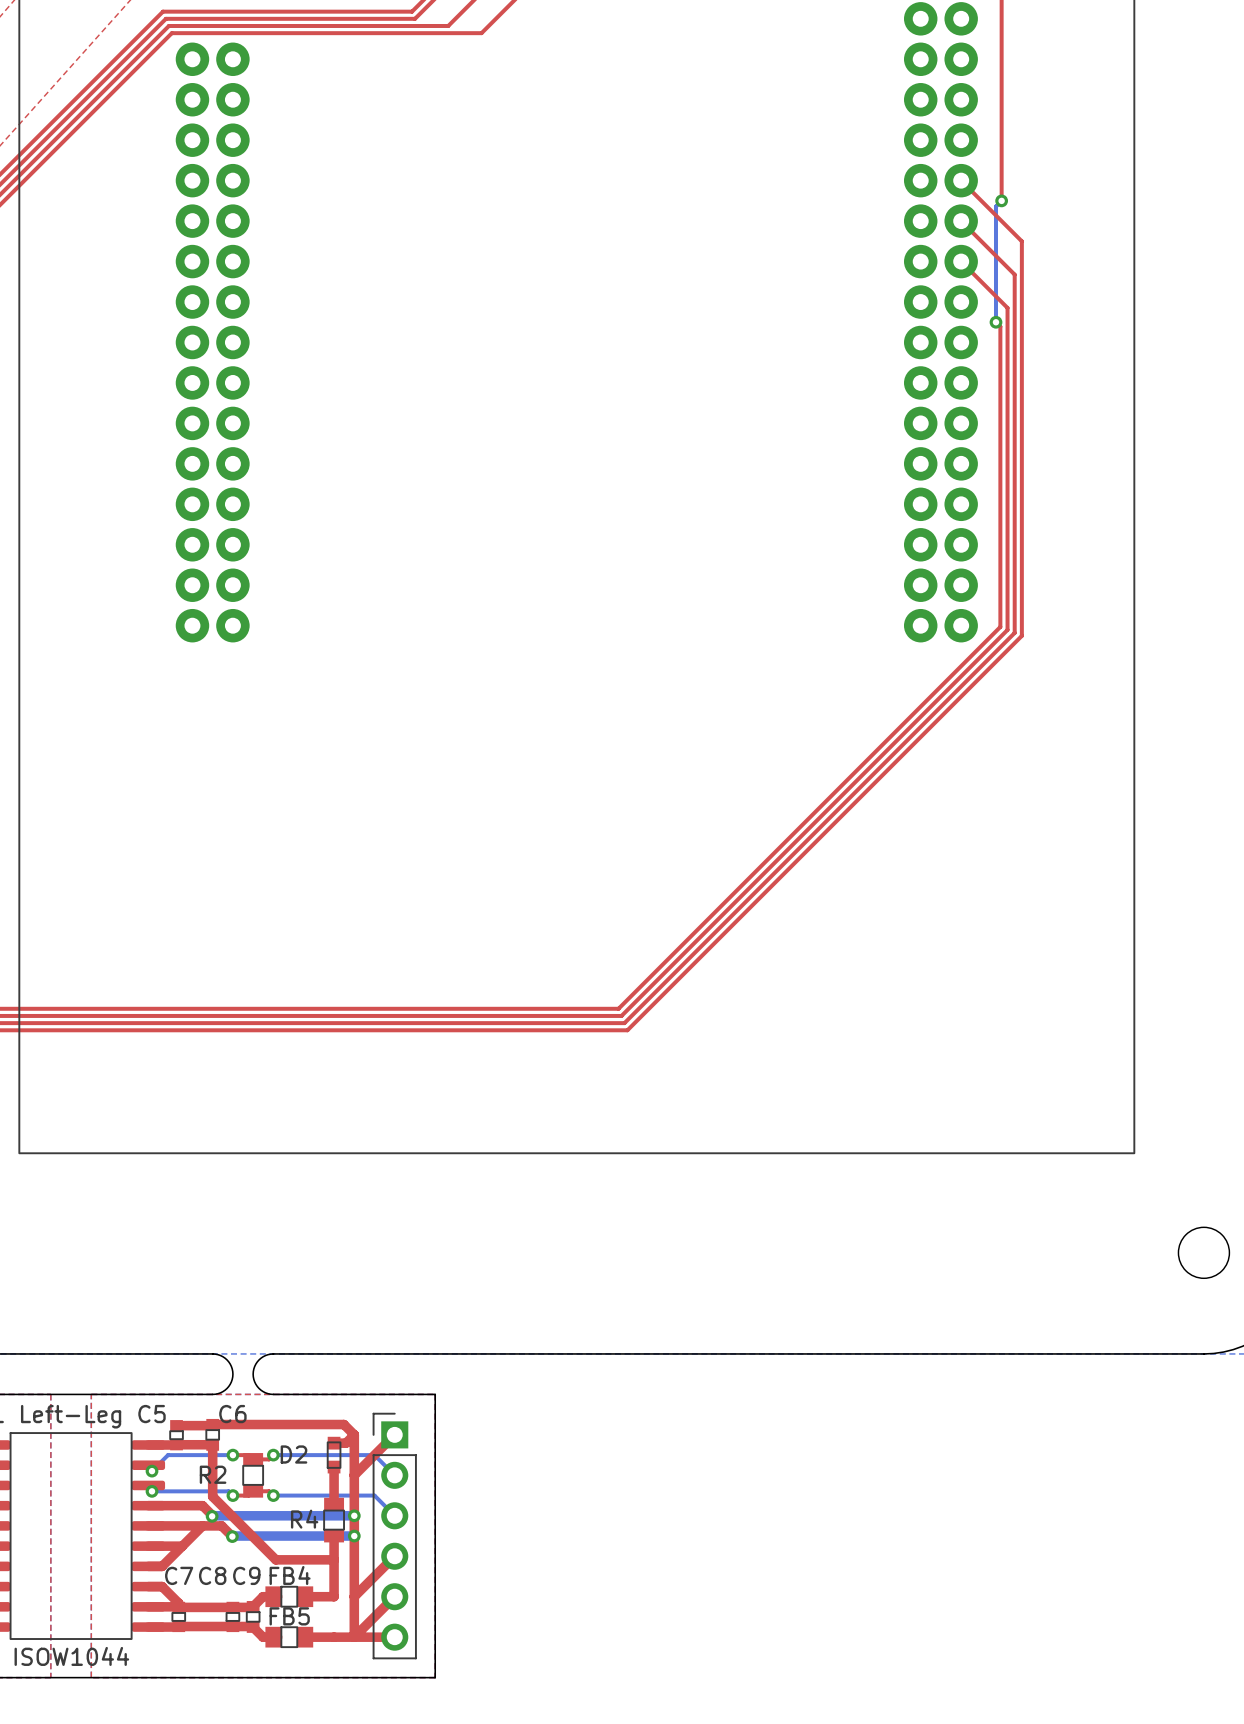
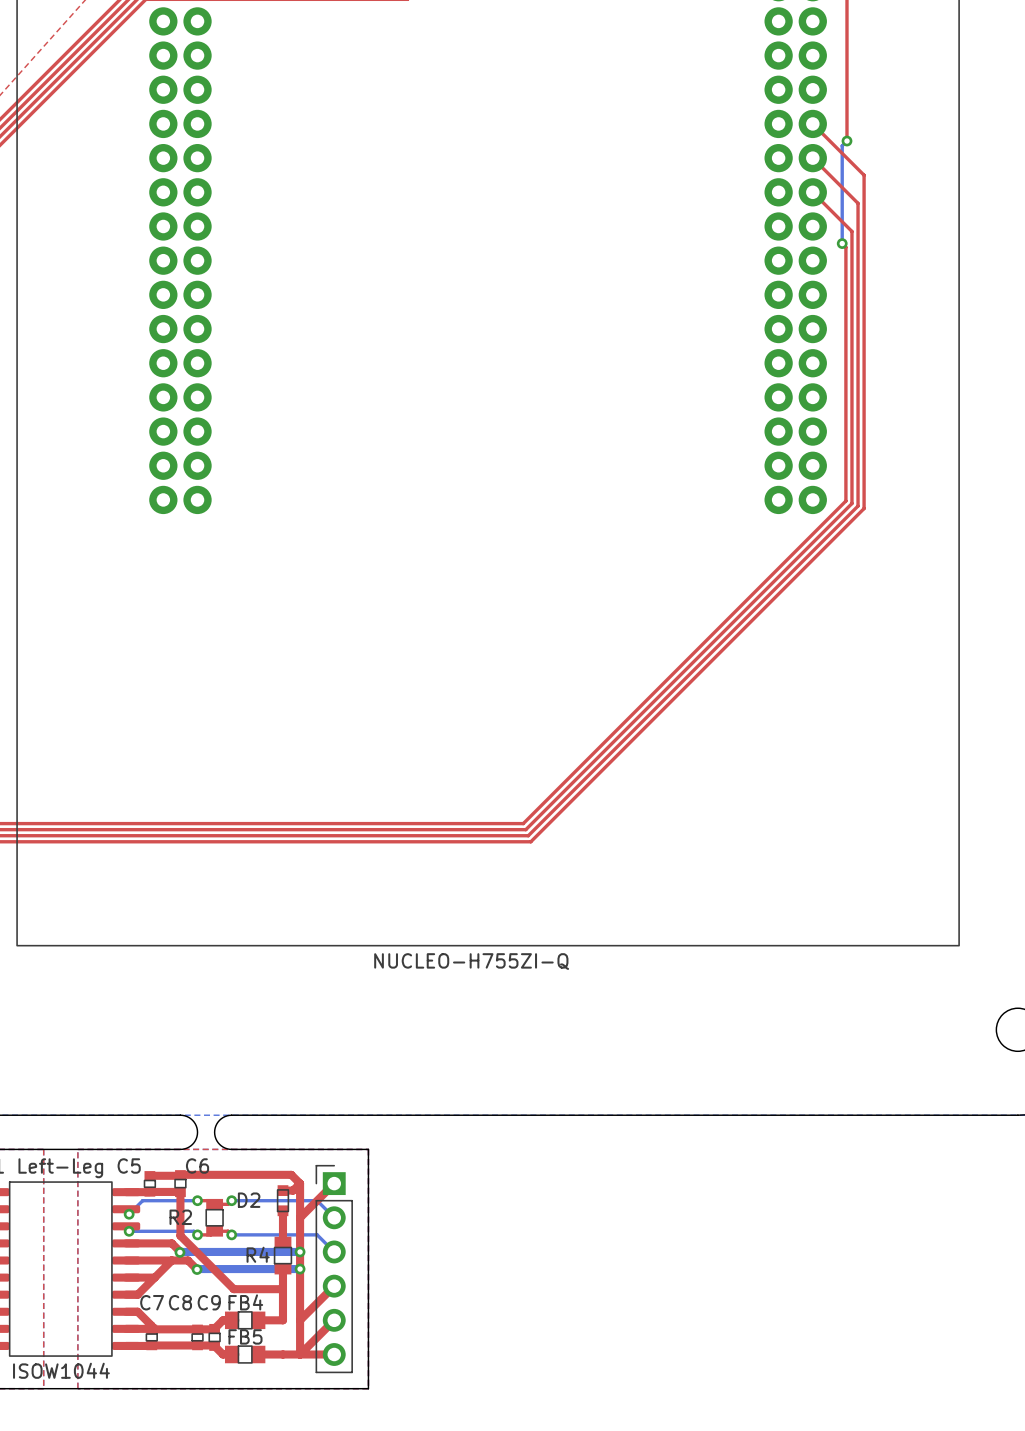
text: none -> NUCLEO-H755ZI-Q (471, 961)

